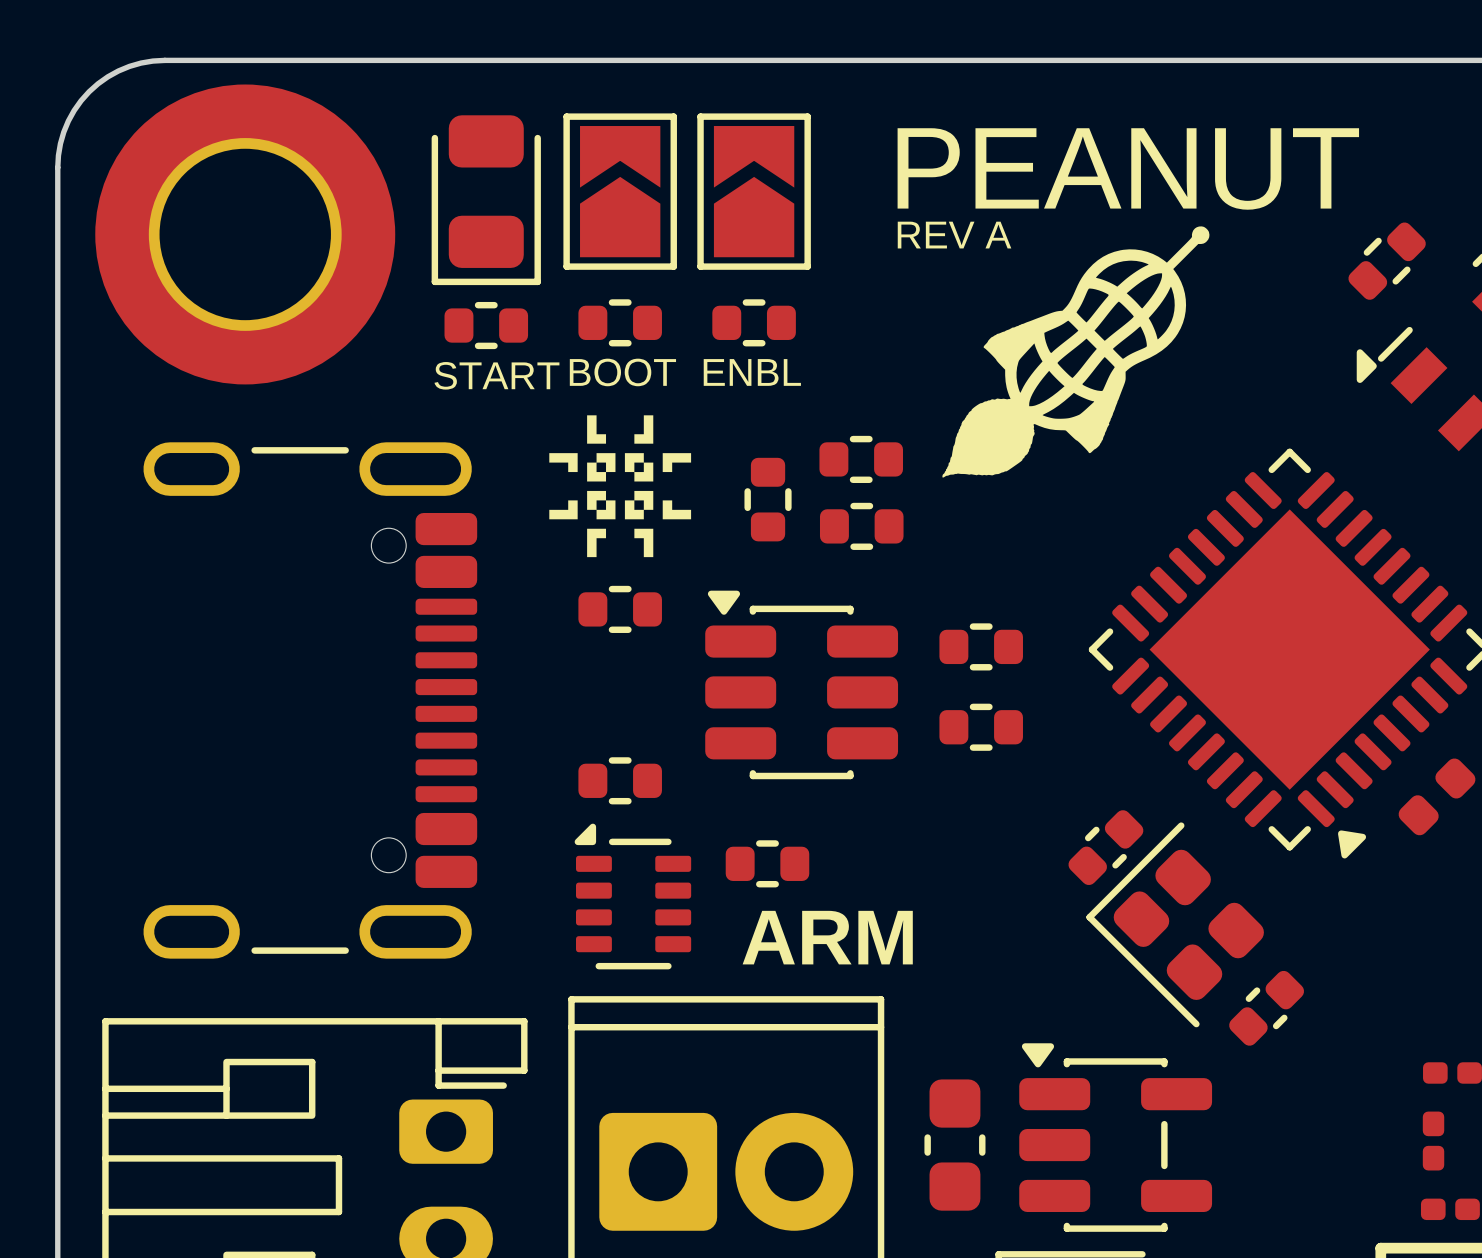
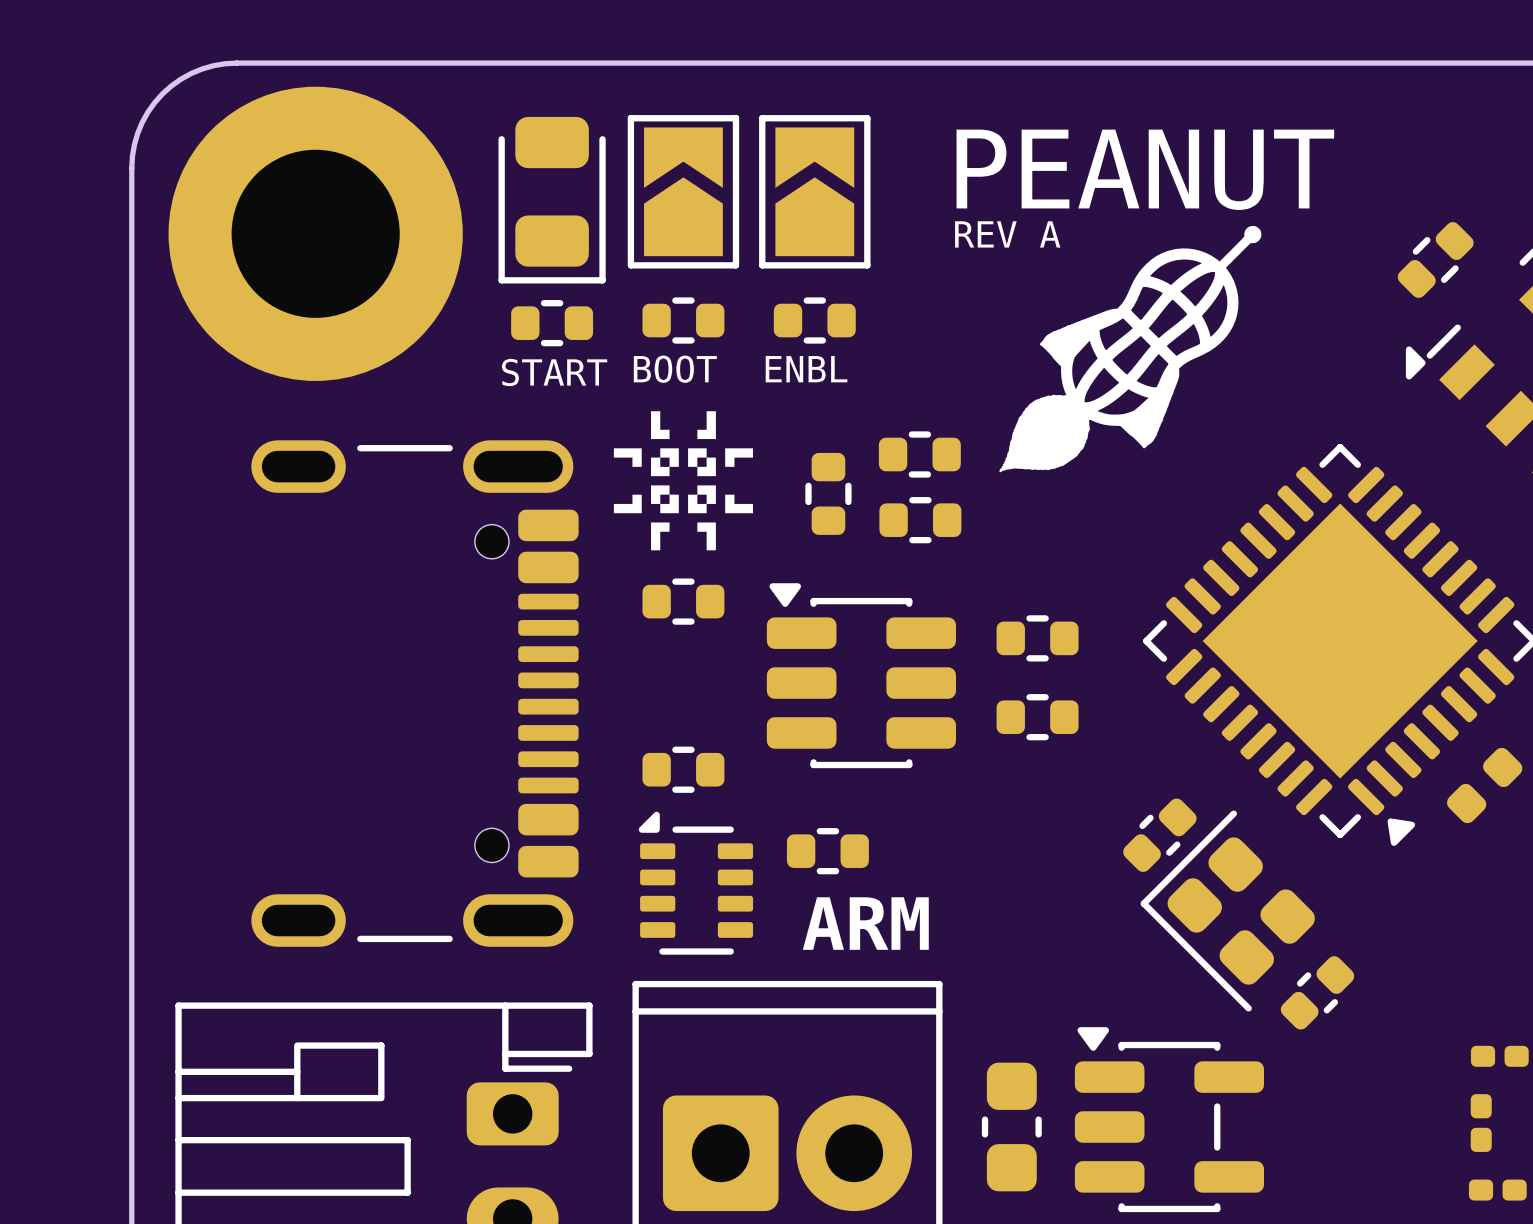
part position: (310, 700) -> (414, 693)

